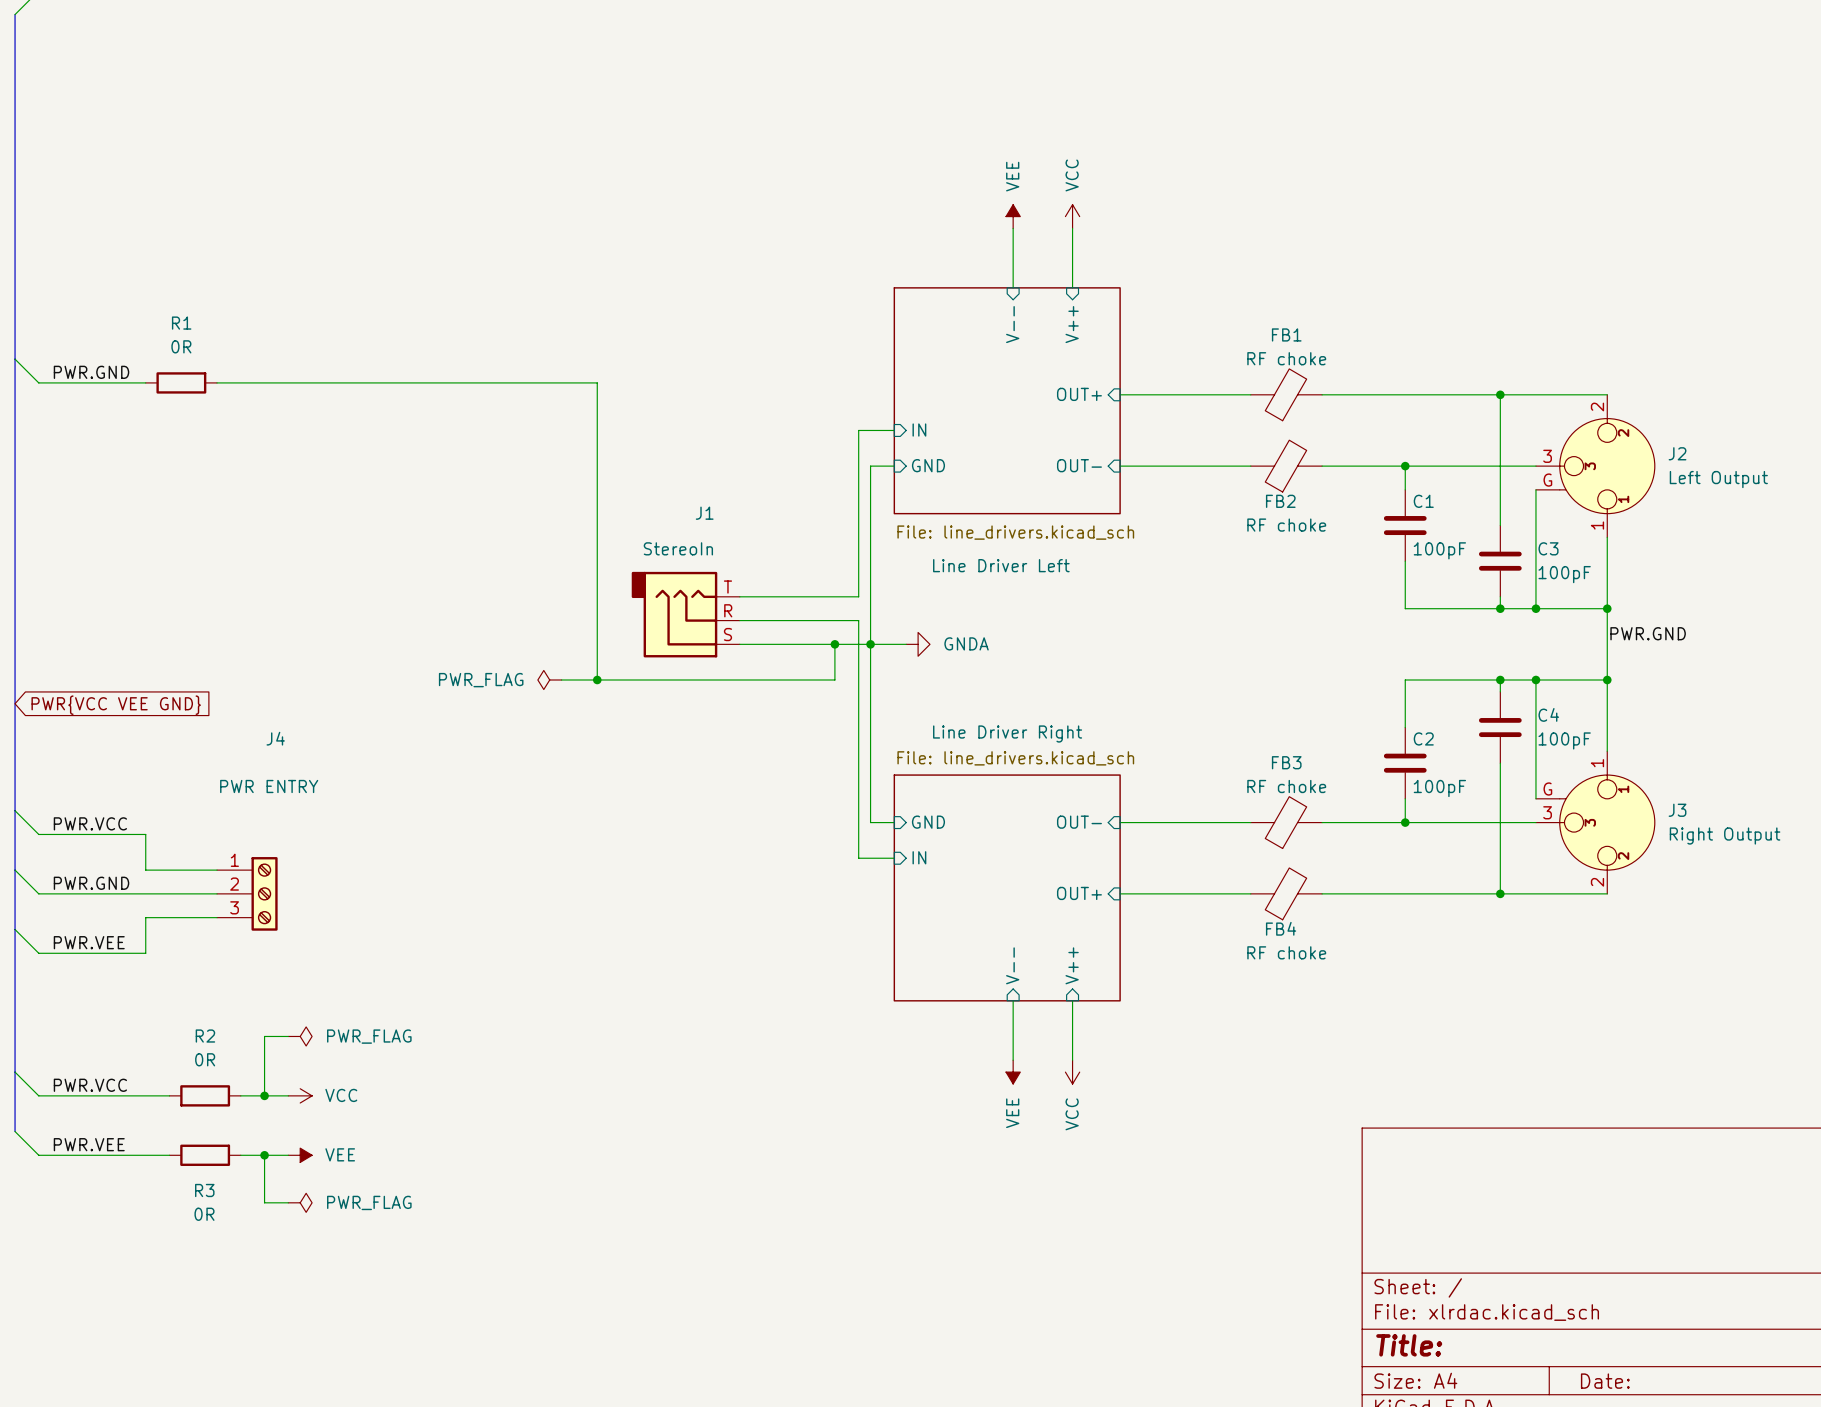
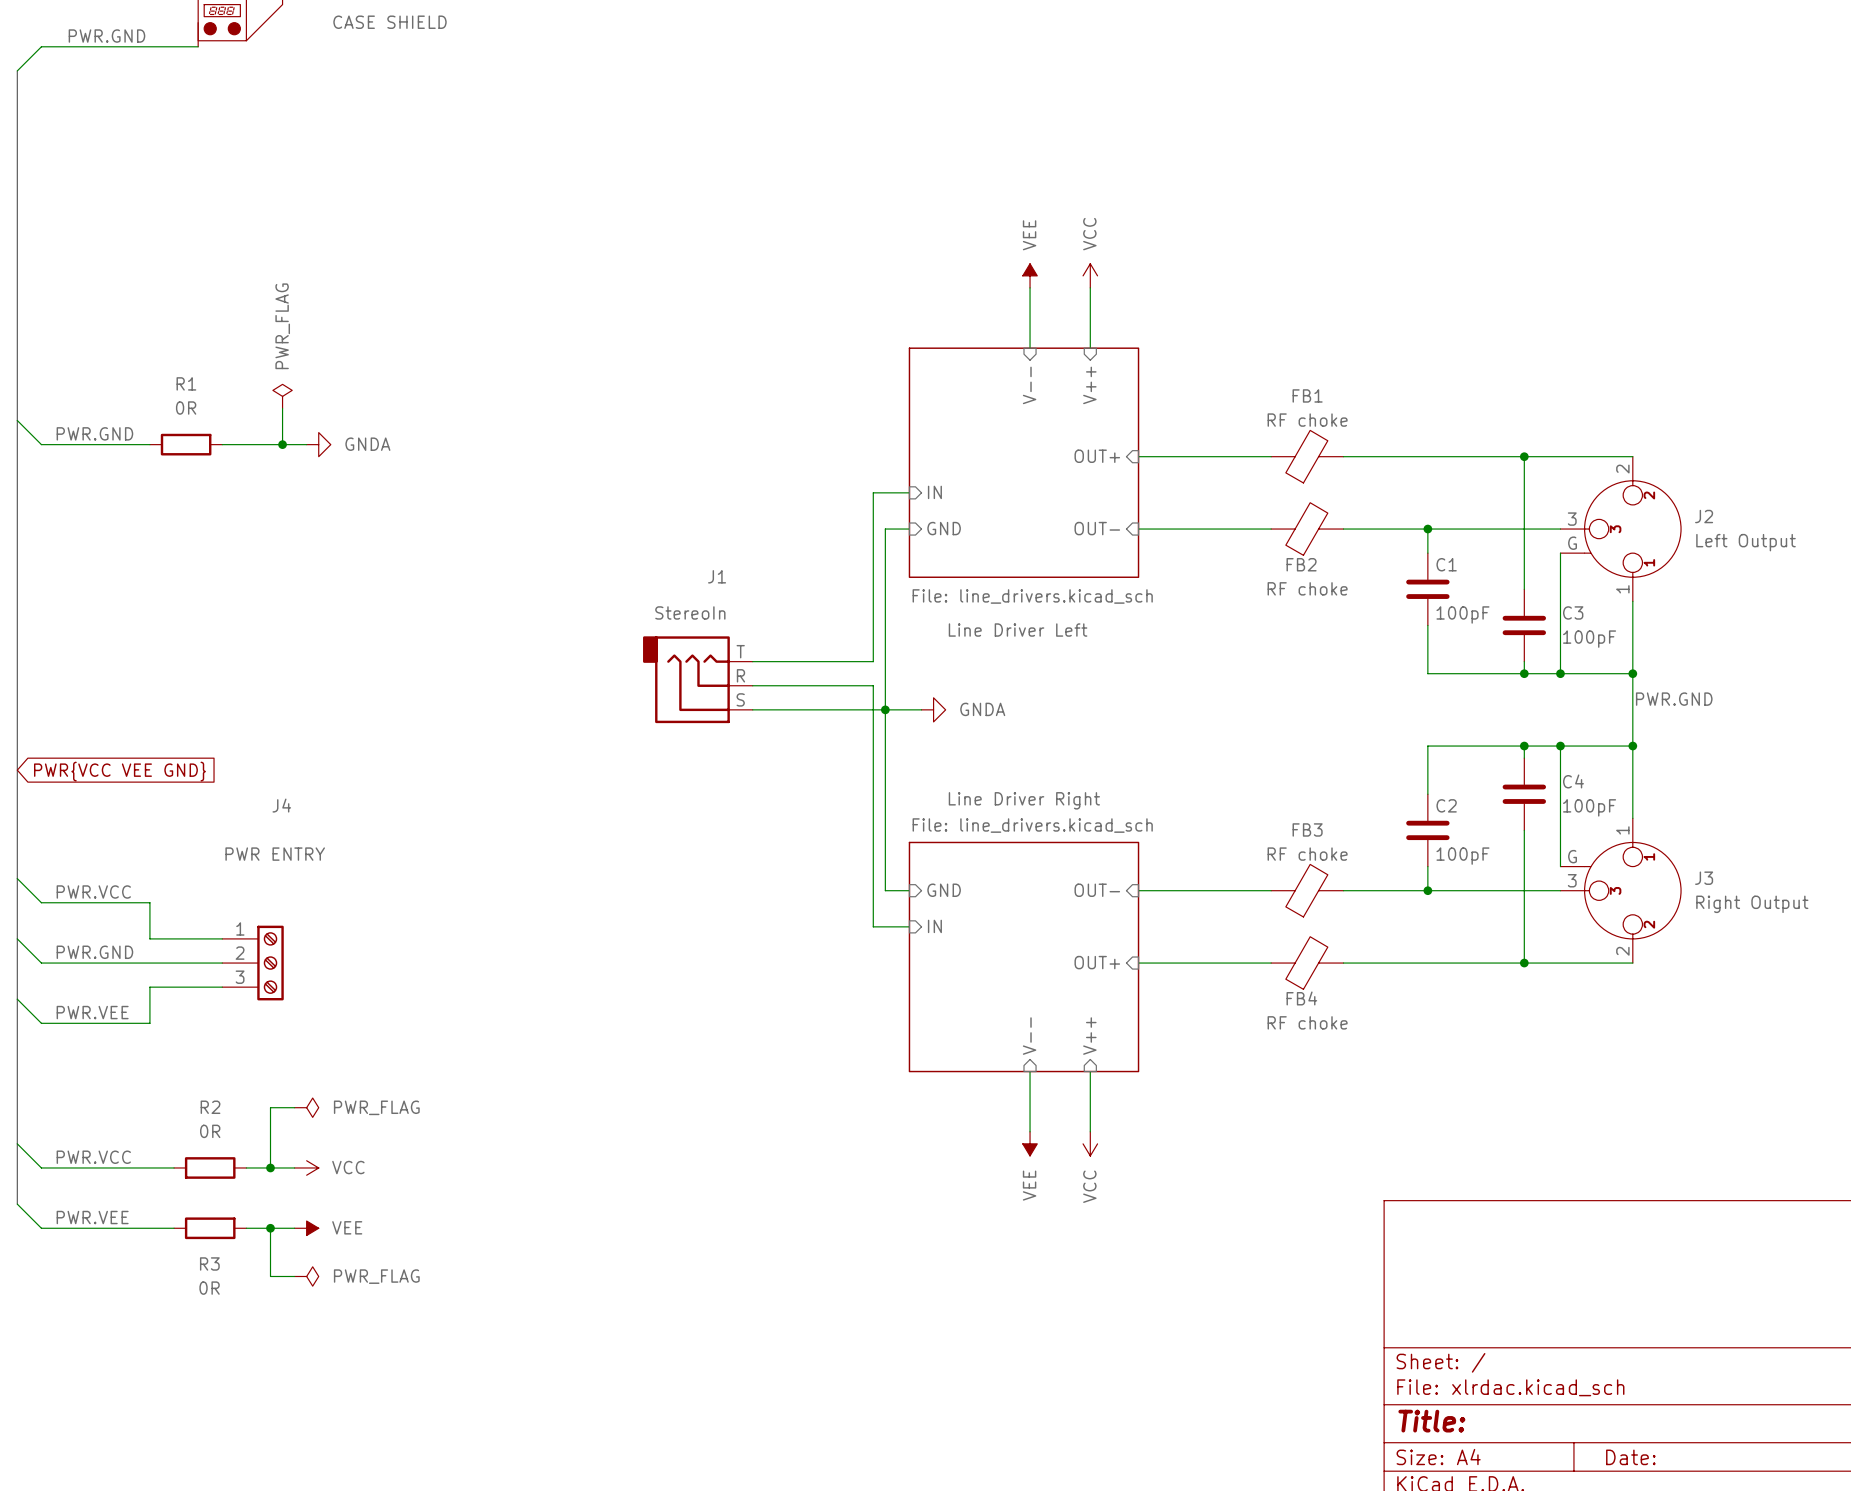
power symbol: none -> PWR_FLAG (282, 396)
wire: none -> (282, 408) (282, 444)
junction: none -> (282, 444)
wire: (300, 382) (597, 382) (597, 679) -> none
power symbol: none -> GNDA (318, 444)
wire: (834, 644) (834, 679) (561, 679) -> none
junction: (834, 644) -> none
power symbol: PWR_FLAG (549, 679) -> none
junction: (597, 679) -> none

